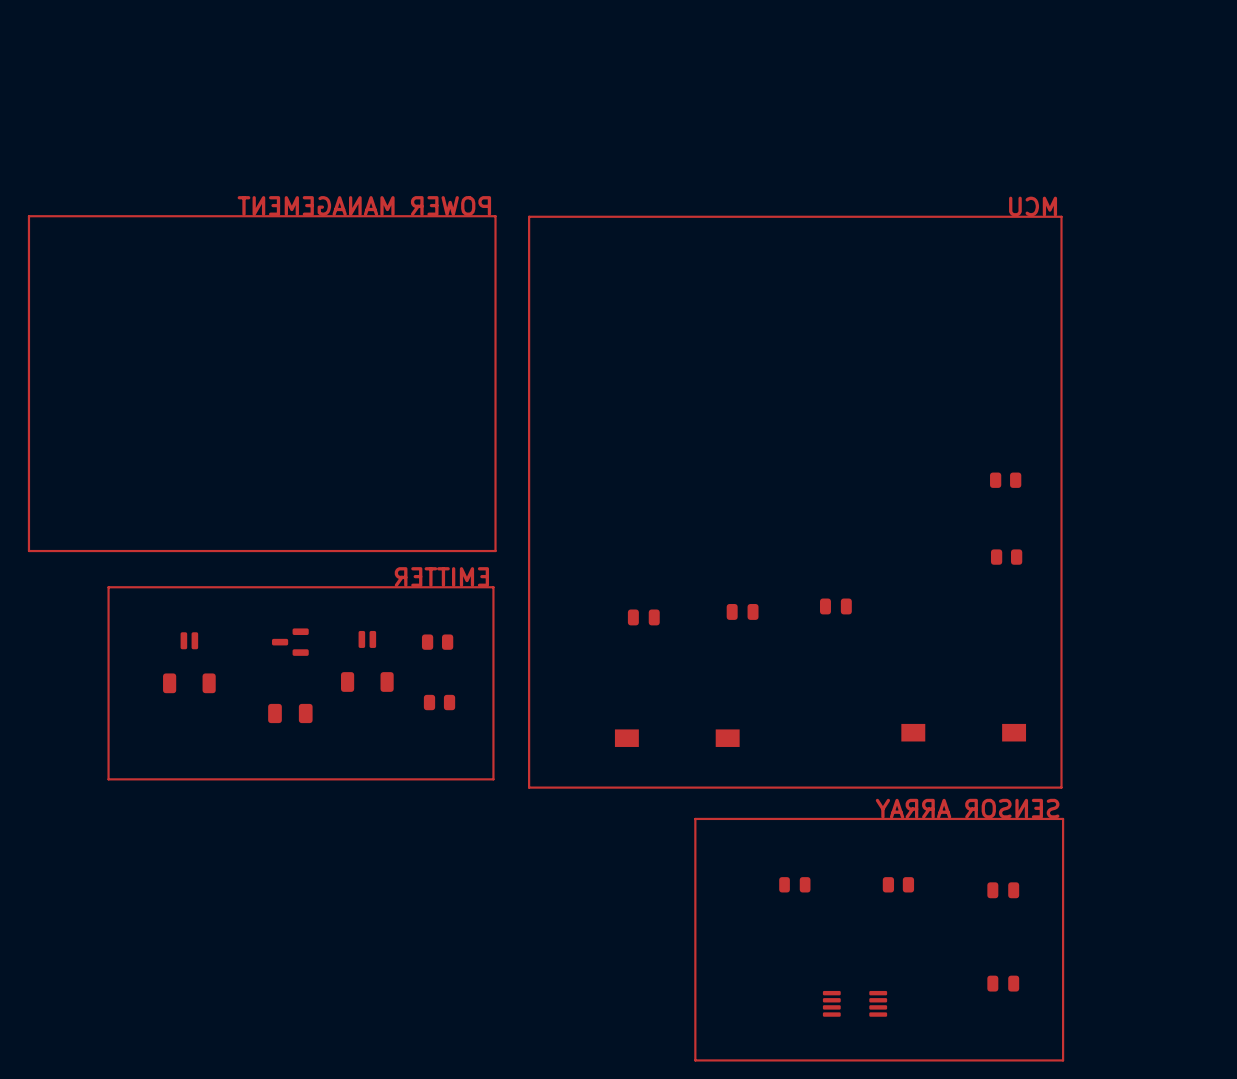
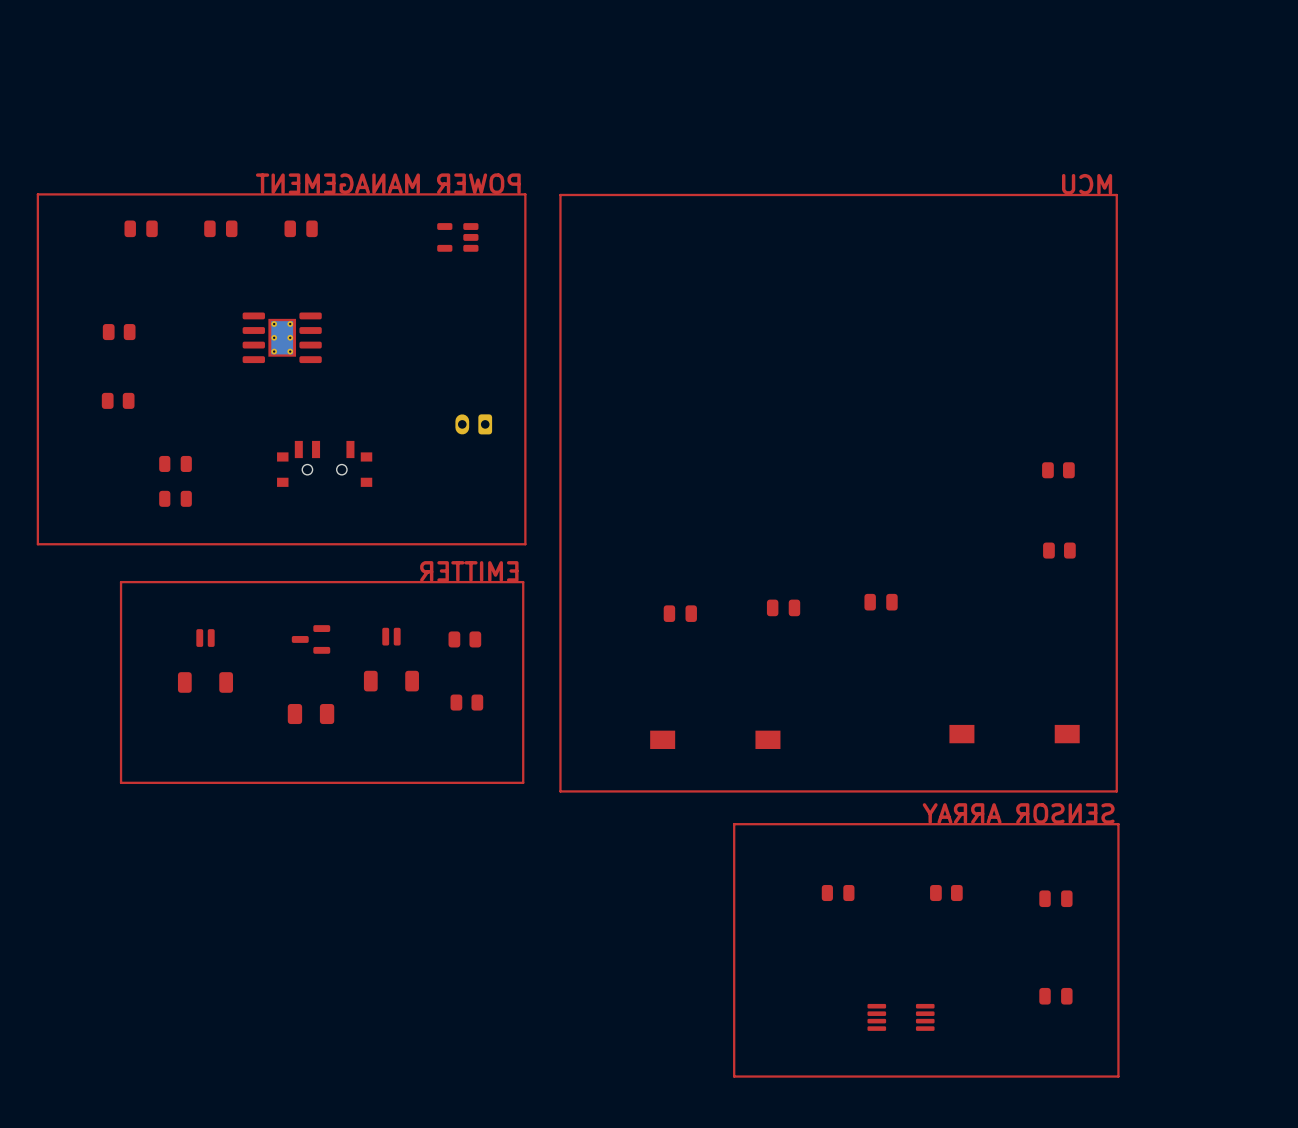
part: none -> (141, 228)
part: none -> (220, 228)
part: none -> (301, 228)
part: none -> (457, 237)
part: none -> (119, 332)
part: none -> (282, 337)
part: none -> (118, 400)
part: none -> (473, 424)
part: none -> (175, 463)
part: none -> (324, 463)
part: none -> (175, 498)

